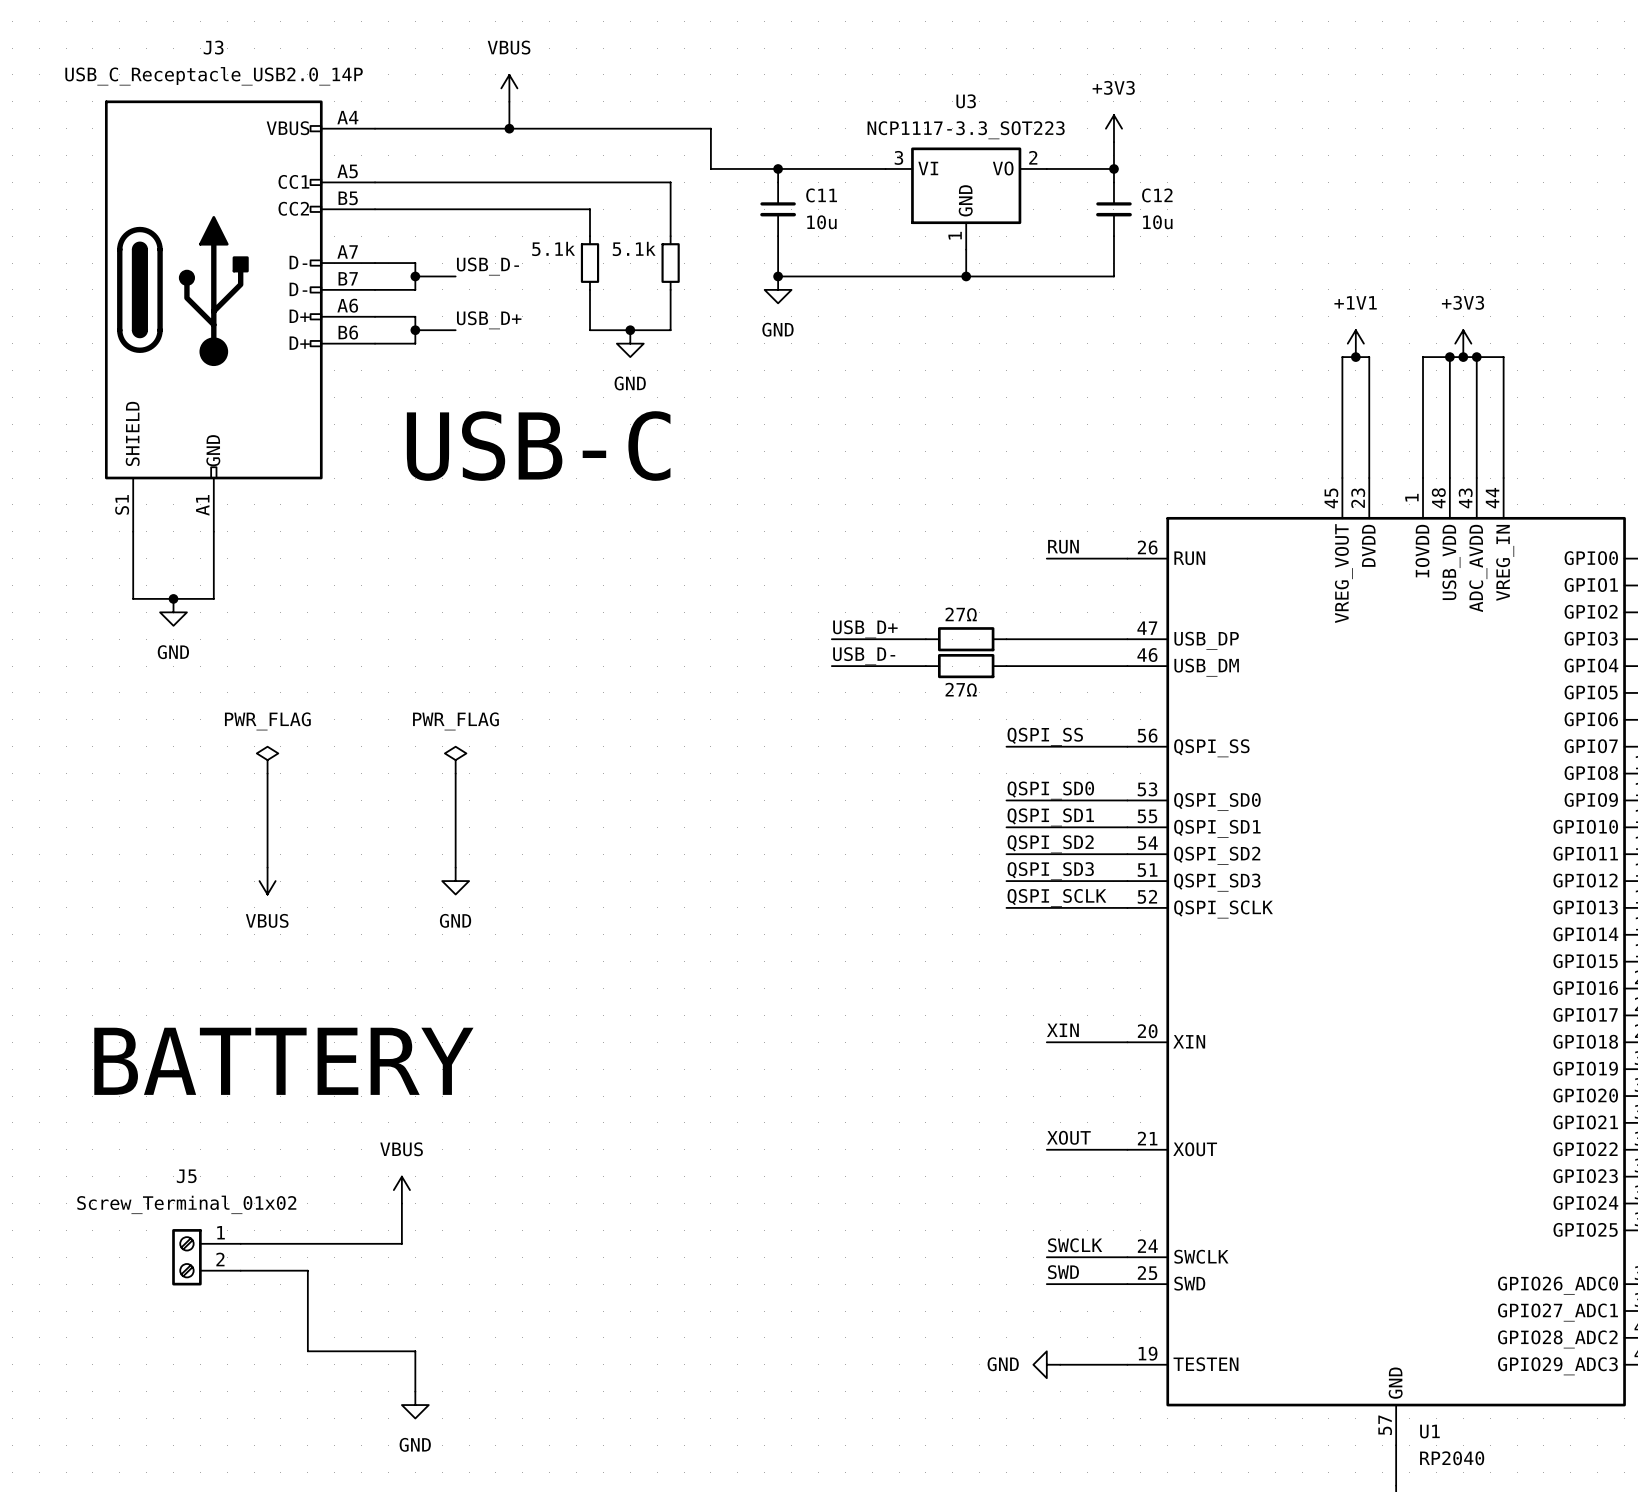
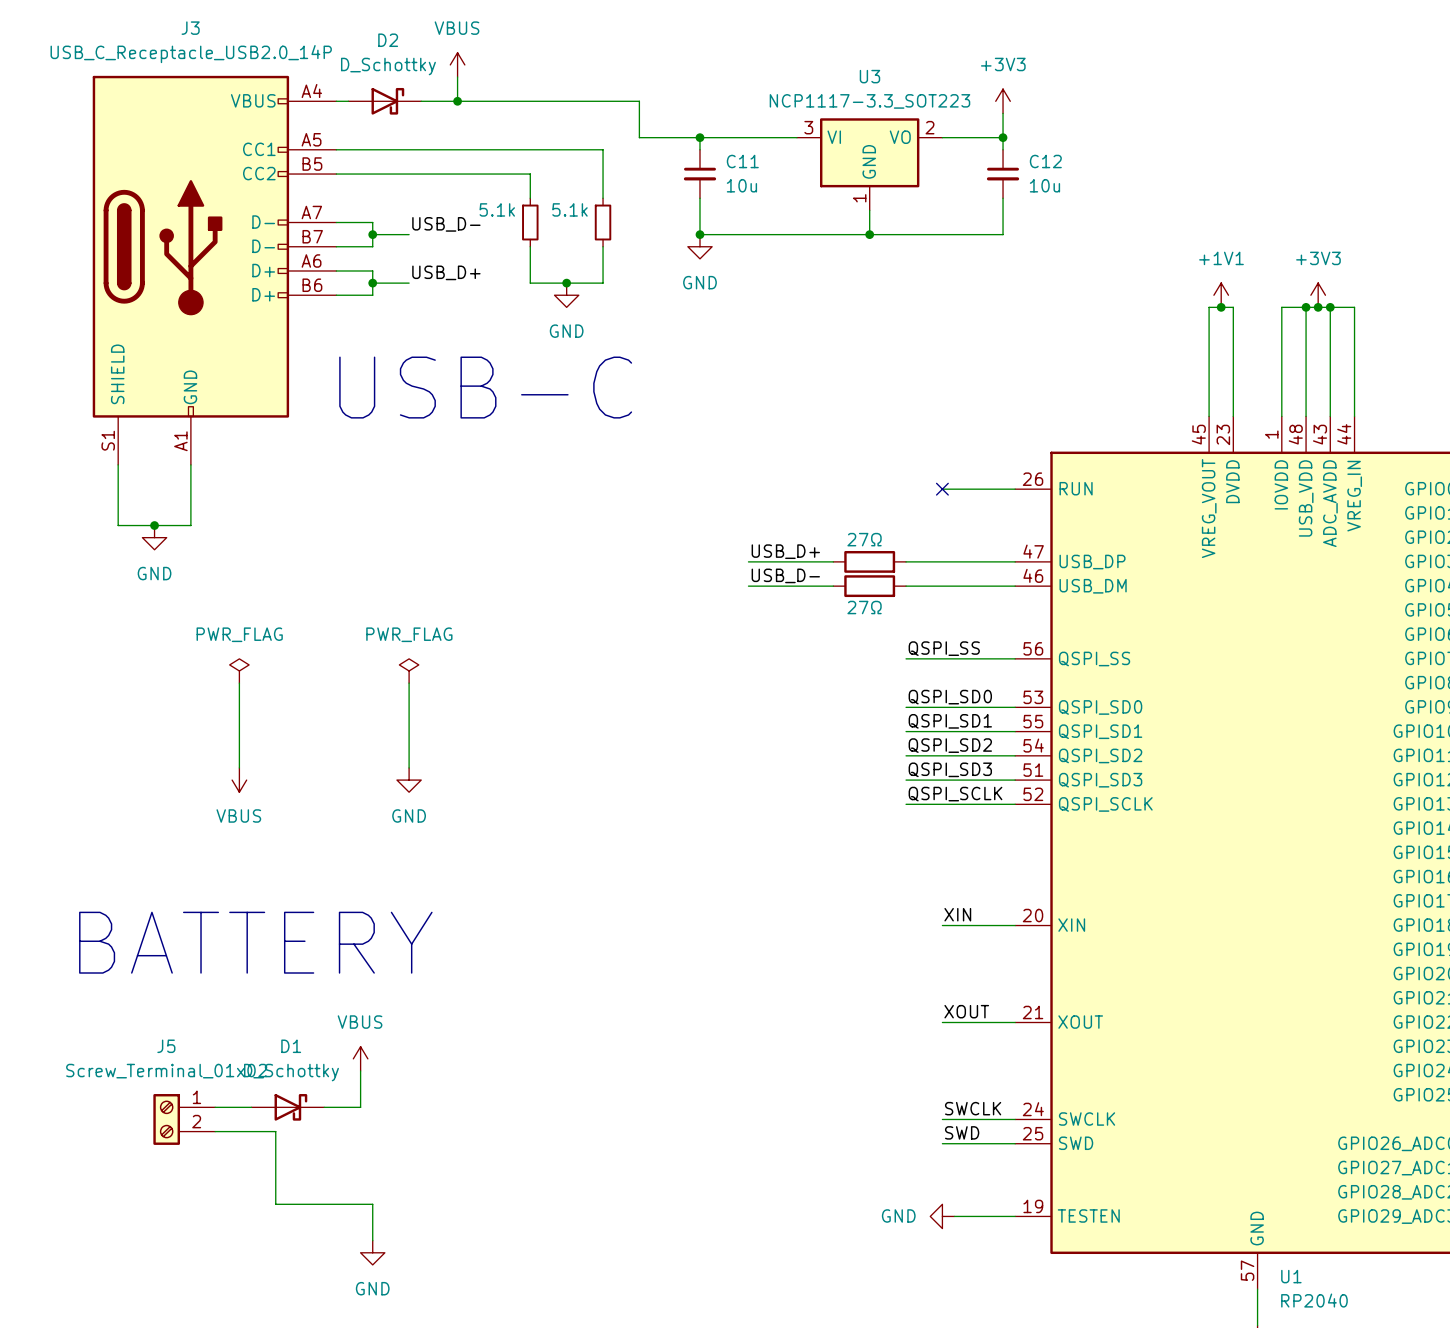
D2: none -> D_Schottky (384, 101)
label: RUN (1063, 546) -> none
no-connect mark: none -> (942, 489)
D1: none -> D_Schottky (287, 1107)

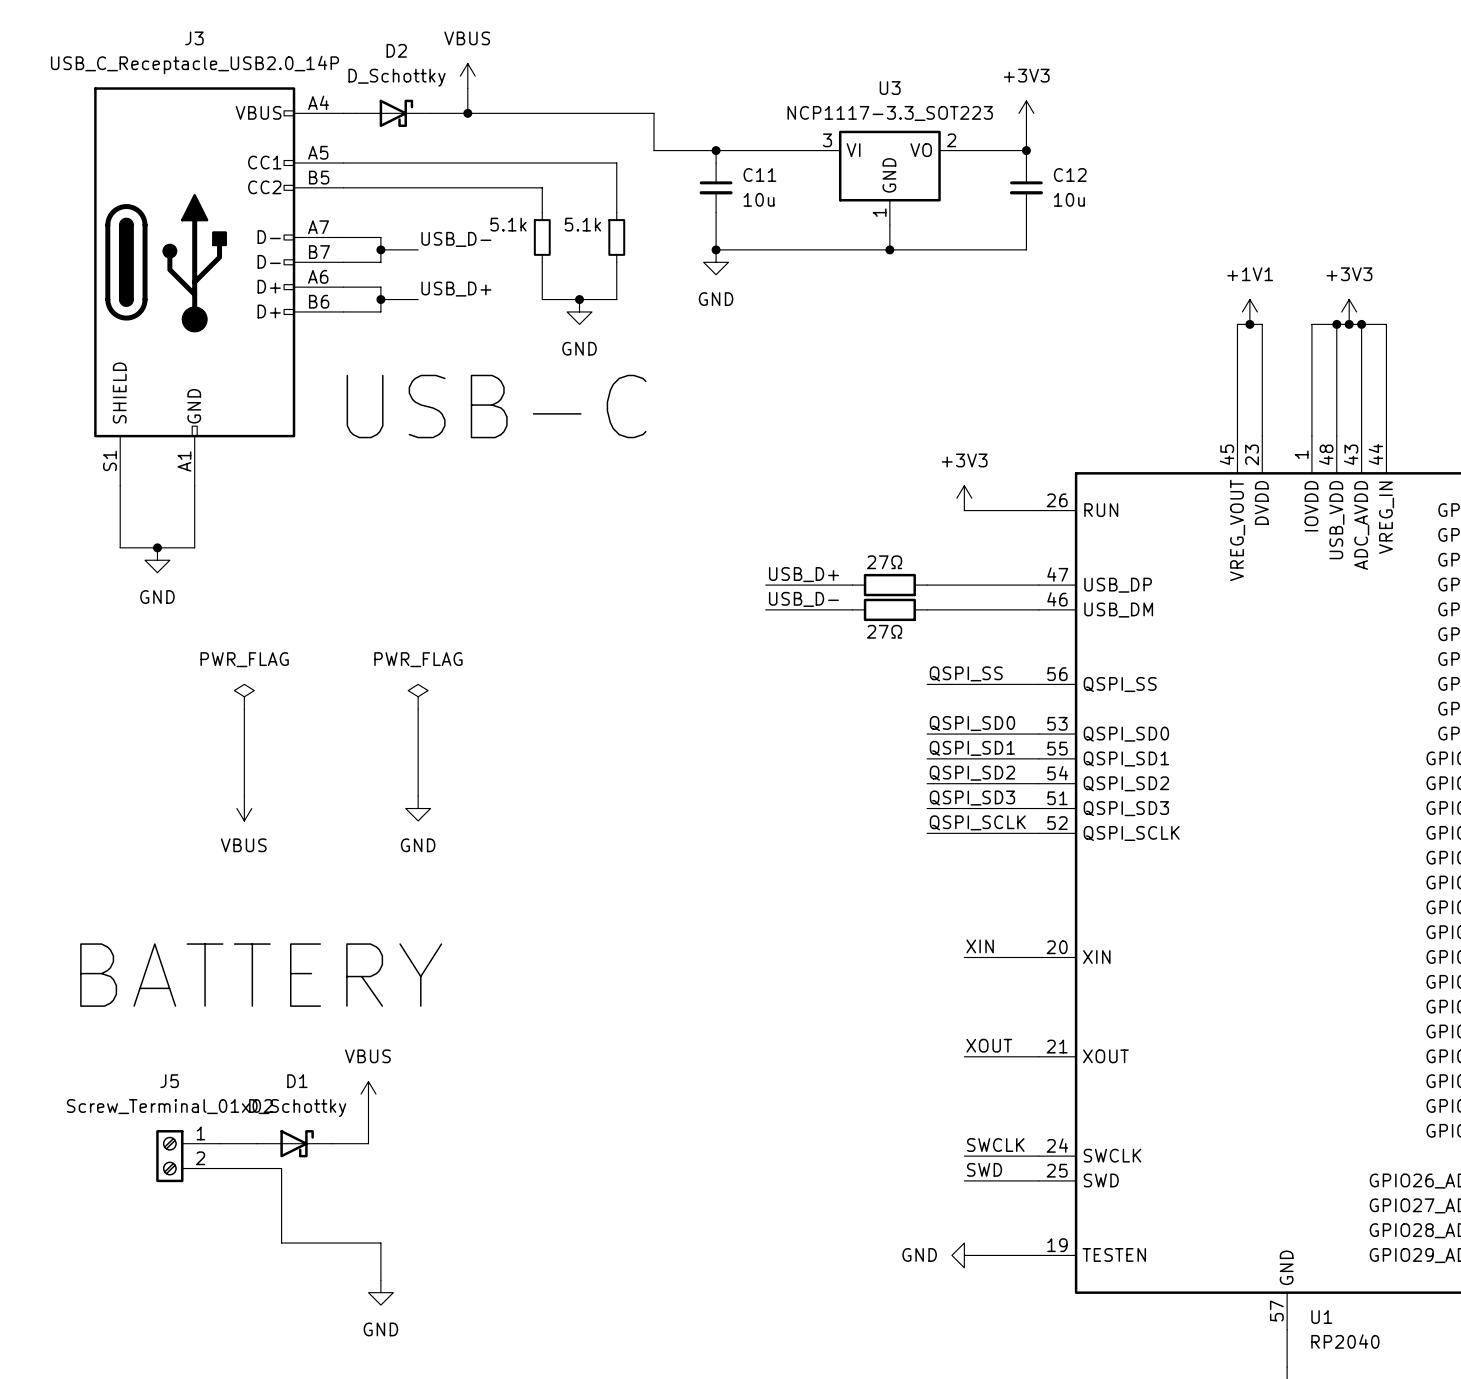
power symbol: none -> +3V3 (964, 498)
no-connect mark: (942, 489) -> none

